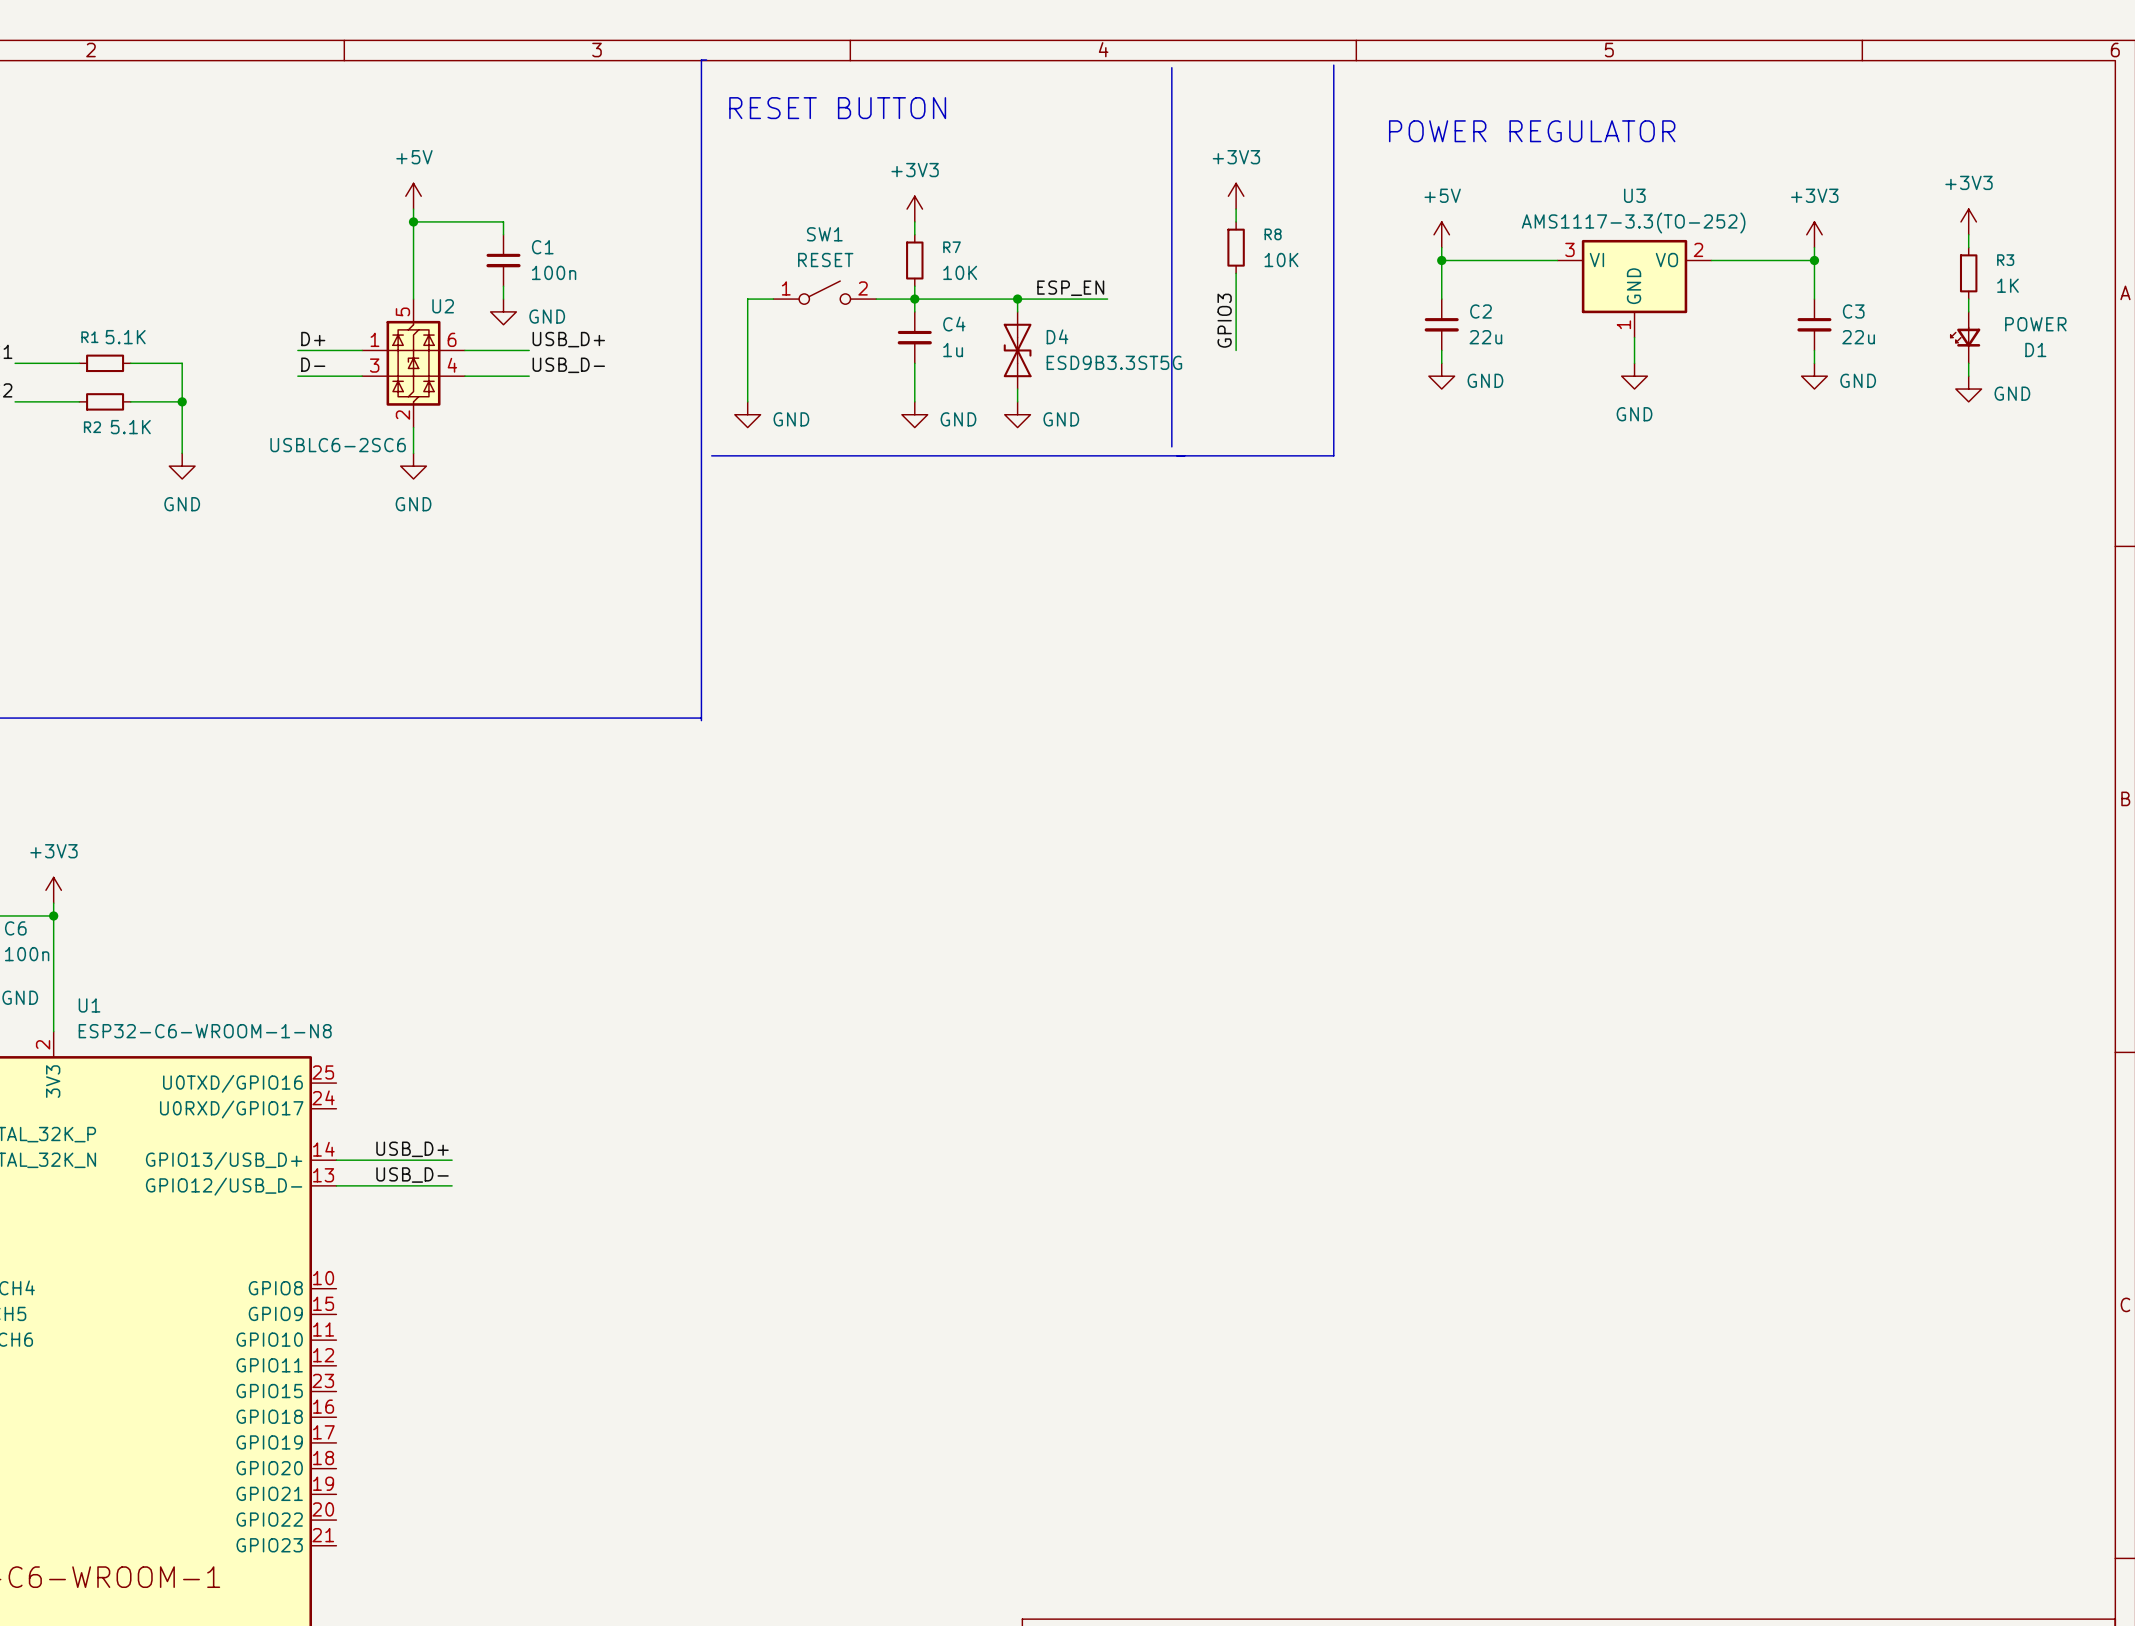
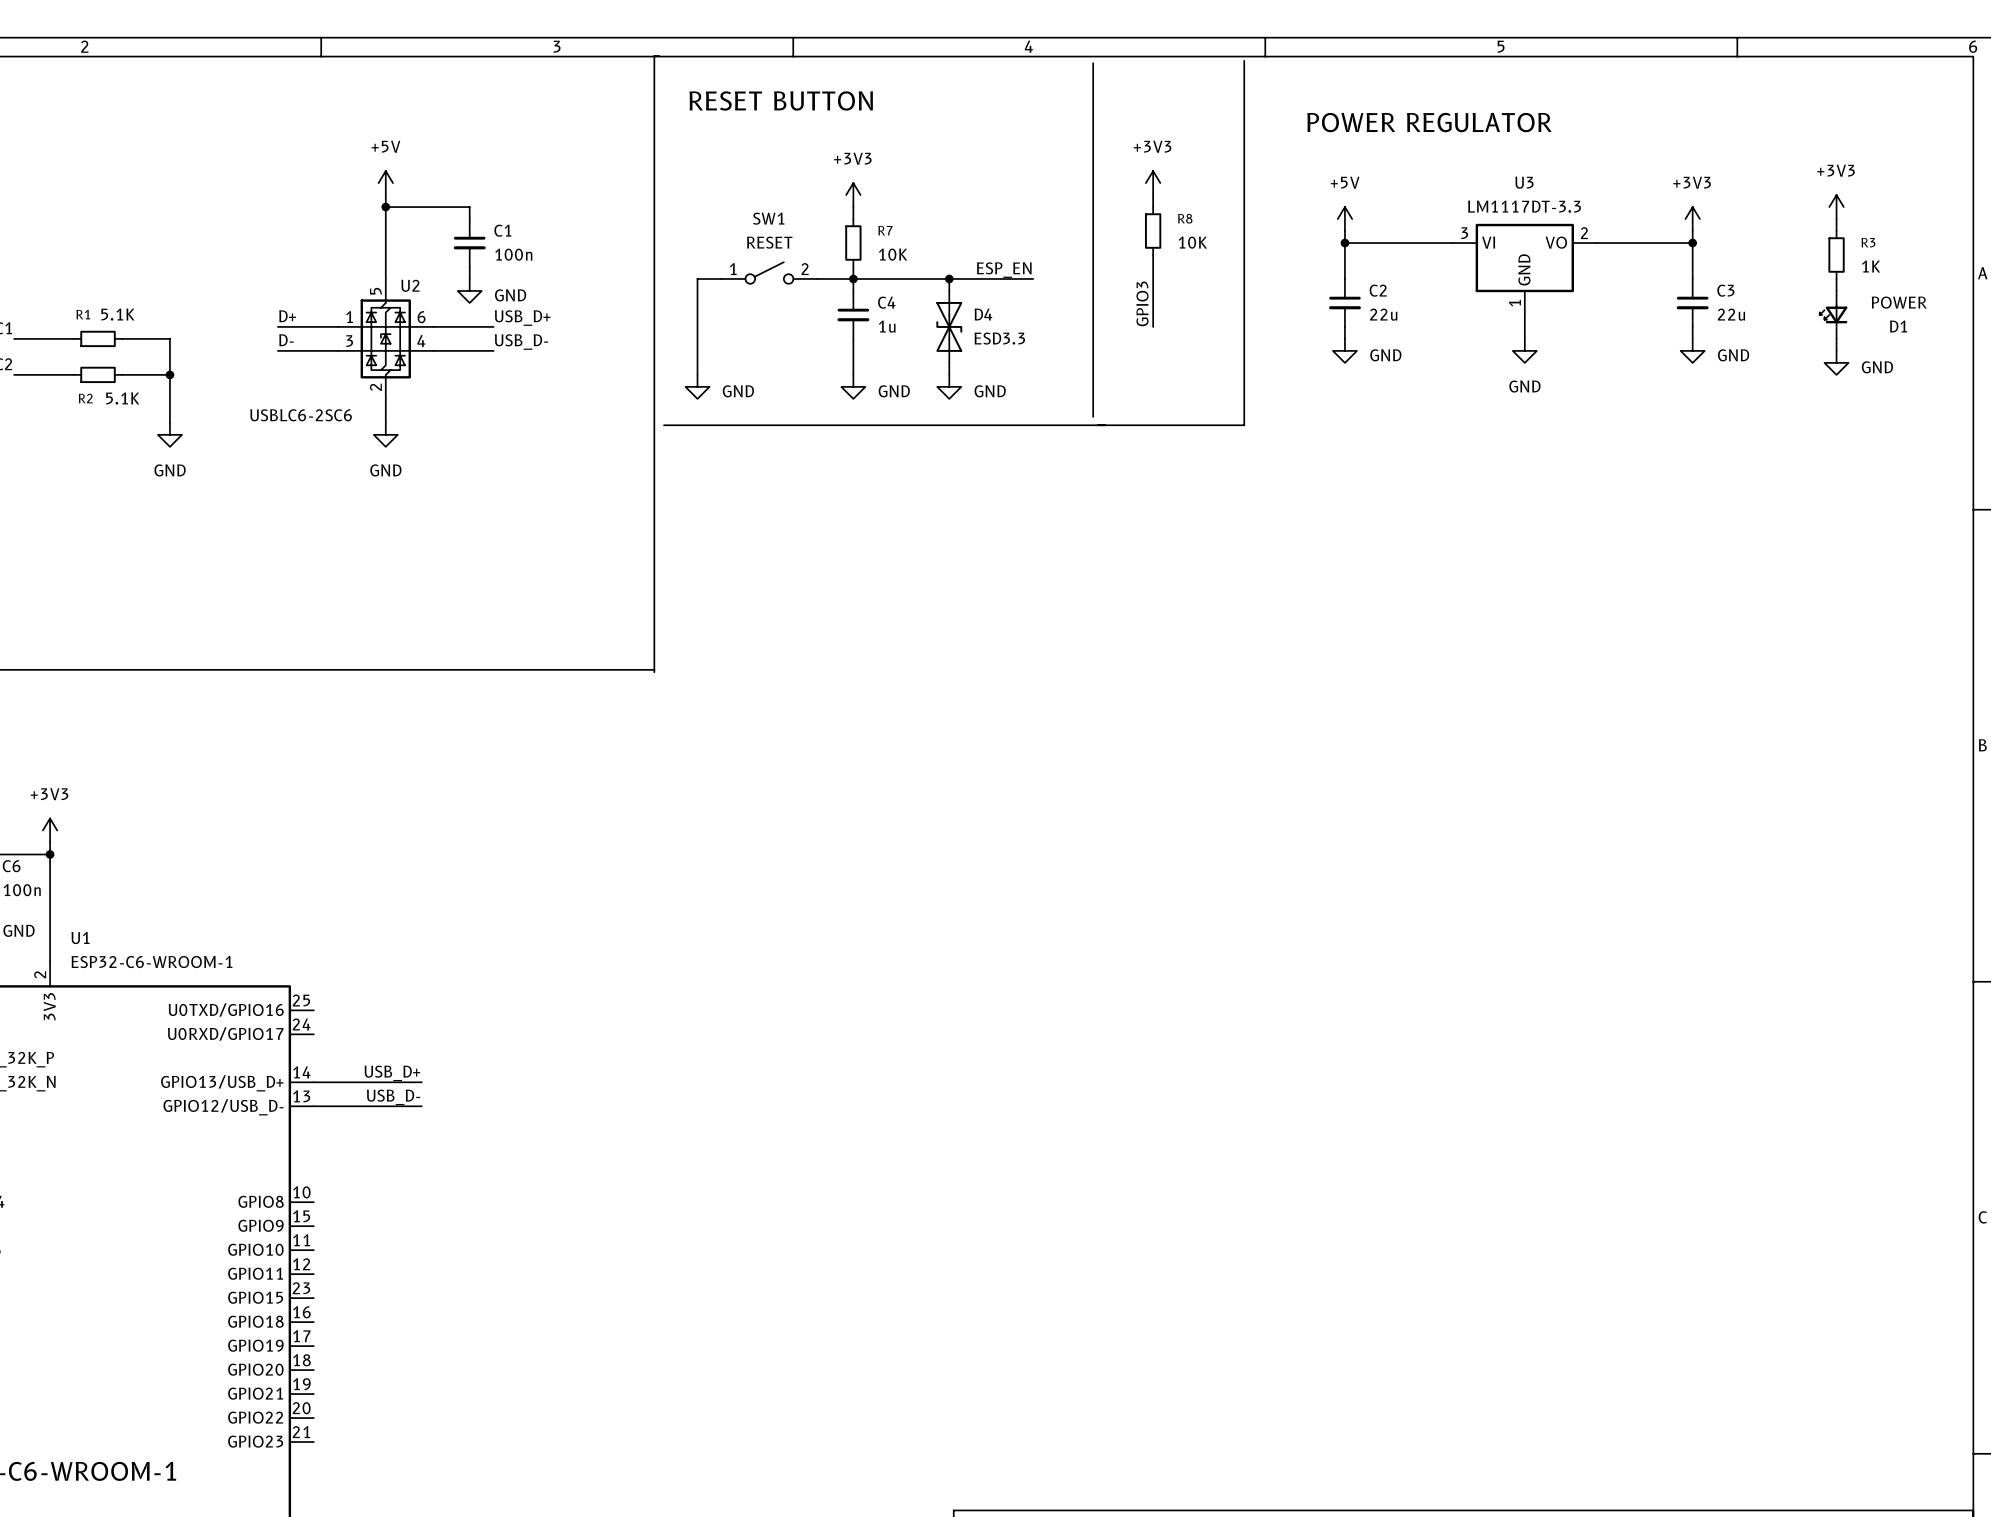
U3 value: AMS1117-3.3(TO-252) (1633, 222) -> LM1117DT-3.3 (1524, 206)
D4 value: ESD9B3.3ST5G (1114, 362) -> ESD3.3 (999, 338)
U1 value: ESP32-C6-WROOM-1-N8 (205, 1031) -> ESP32-C6-WROOM-1 (151, 962)

